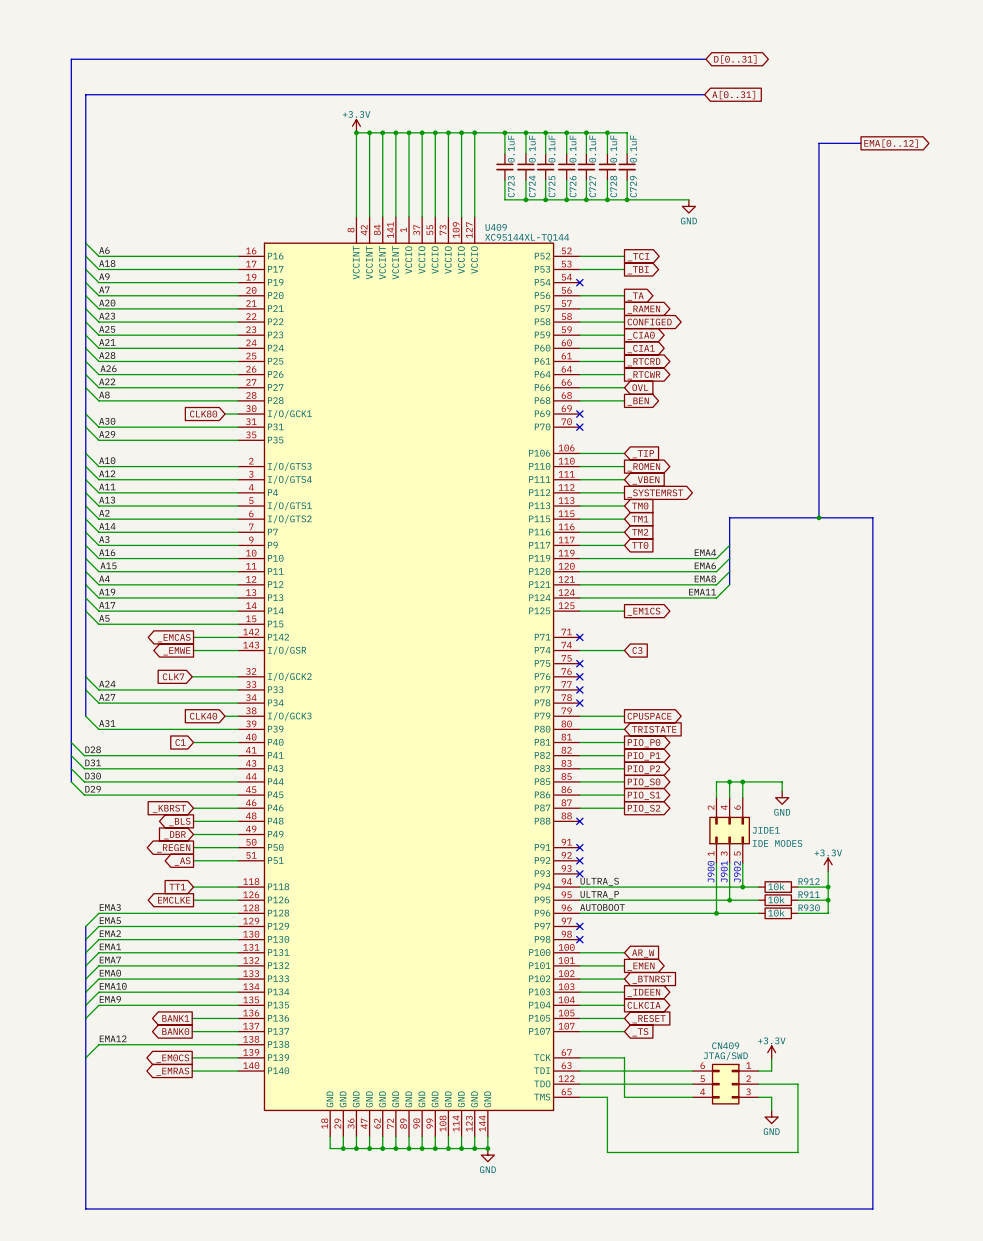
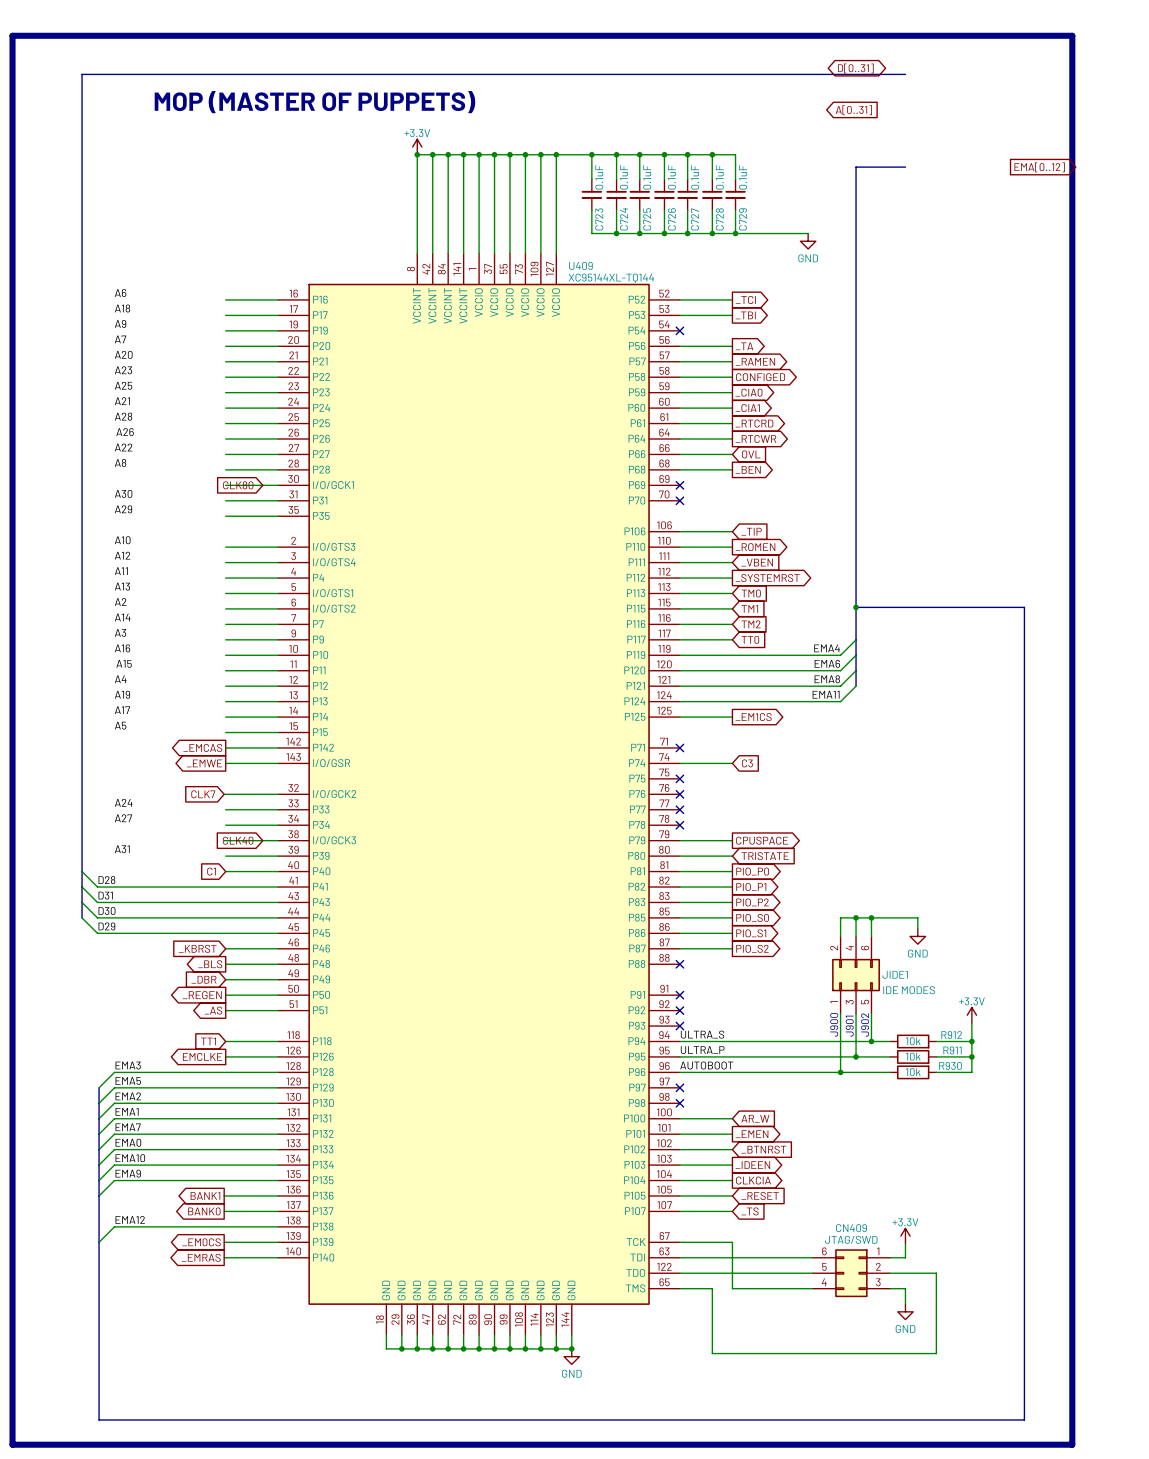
line: none -> (12, 35) (1072, 35) (1072, 1444) (12, 1444) (12, 35)
bus: (705, 59) (71, 59) (71, 64) -> (905, 74) (82, 74)
text: none -> MOP (MASTER OF PUPPETS) (314, 102)
bus: (704, 94) (85, 94) (85, 597) -> none
bus: (861, 143) (818, 143) (818, 517) -> (905, 167) (856, 167) (856, 607)
wire: (85, 243) (98, 256) (193, 256) -> none
wire: (85, 256) (98, 269) (193, 269) -> none
wire: (85, 269) (98, 282) (193, 282) -> none
wire: (85, 282) (98, 295) (193, 295) -> none
wire: (85, 295) (98, 308) (193, 308) -> none
wire: (85, 308) (98, 322) (193, 322) -> none
wire: (85, 322) (98, 335) (193, 335) -> none
wire: (85, 335) (98, 348) (193, 348) -> none
wire: (85, 348) (98, 361) (193, 361) -> none
wire: (85, 361) (98, 374) (193, 374) -> none
wire: (85, 374) (98, 387) (193, 387) -> none
wire: (85, 387) (98, 400) (193, 400) -> none
wire: (85, 414) (98, 427) (193, 427) -> none
wire: none -> (225, 485) (262, 485)
wire: (85, 427) (98, 440) (193, 440) -> none
wire: (85, 453) (98, 466) (193, 466) -> none
wire: (85, 466) (98, 479) (193, 479) -> none
wire: (85, 479) (98, 492) (193, 492) -> none
wire: (85, 492) (98, 506) (193, 506) -> none
wire: (85, 506) (98, 519) (193, 519) -> none
junction: none -> (856, 607)
junction: (818, 517) -> none
wire: (85, 519) (98, 532) (193, 532) -> none
wire: (85, 532) (98, 545) (193, 545) -> none
wire: (85, 545) (98, 558) (193, 558) -> none
wire: (85, 558) (98, 571) (193, 571) -> none
wire: (85, 571) (98, 584) (193, 584) -> none
wire: (85, 584) (98, 597) (193, 597) -> none
wire: (85, 597) (98, 611) (193, 611) -> none
bus: (85, 599) (85, 716) -> none
wire: (85, 611) (98, 624) (193, 624) -> none
wire: (85, 676) (98, 689) (193, 689) -> none
wire: (85, 689) (98, 703) (193, 703) -> none
wire: (85, 716) (98, 729) (193, 729) -> none
wire: none -> (224, 840) (262, 840)

